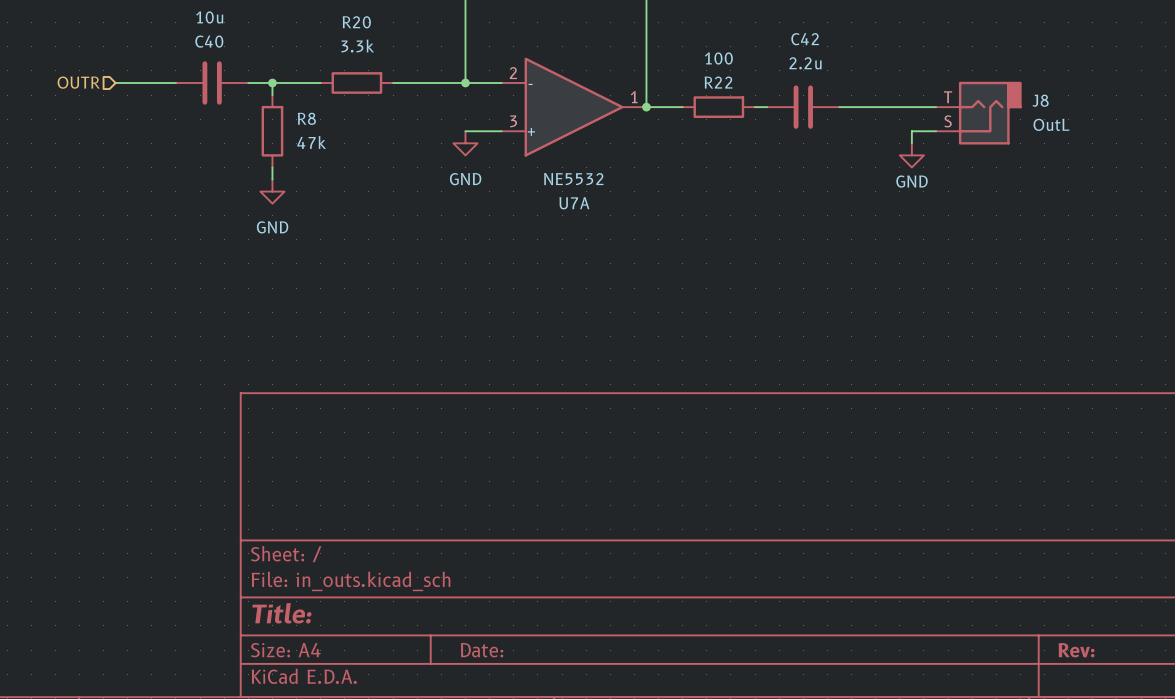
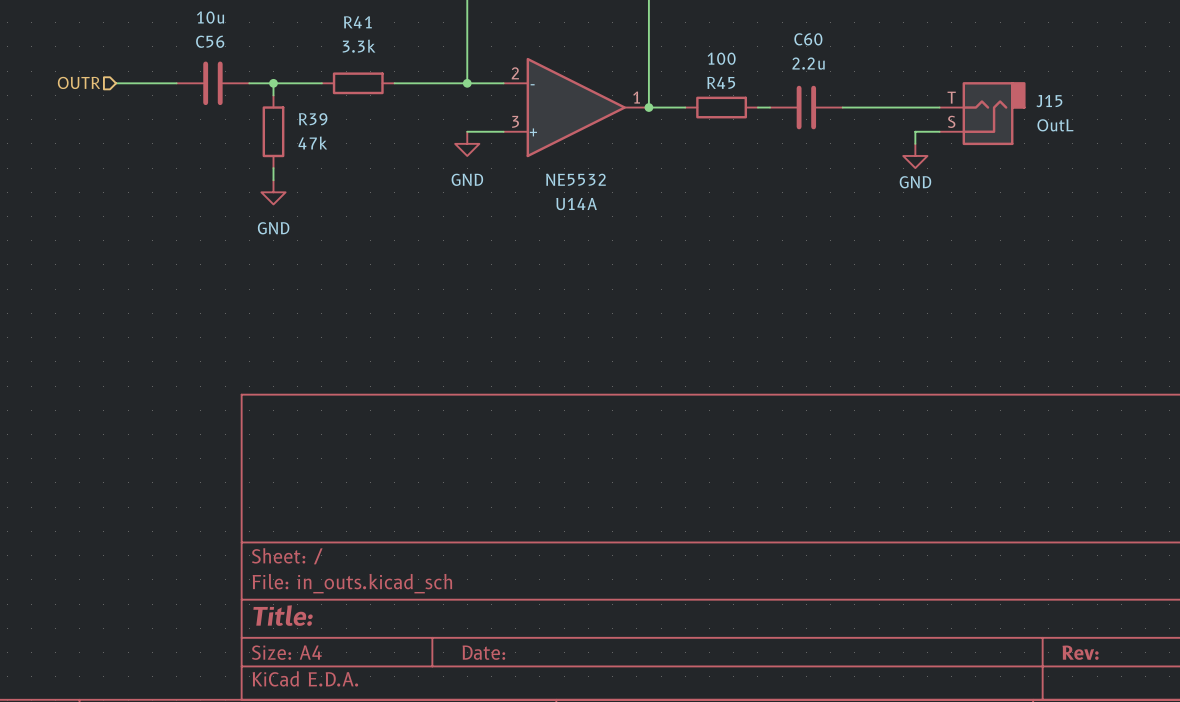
R20 name: R20 (356, 22) -> R41 (357, 22)
C42 name: C42 (805, 39) -> C60 (808, 39)
C40 name: C40 (209, 41) -> C56 (210, 41)
R22 name: R22 (718, 82) -> R45 (721, 82)
J8 name: J8 (1040, 100) -> J15 (1049, 101)
R8 name: R8 (306, 118) -> R39 (313, 119)
U7A name: U7A (574, 203) -> U14A (576, 204)

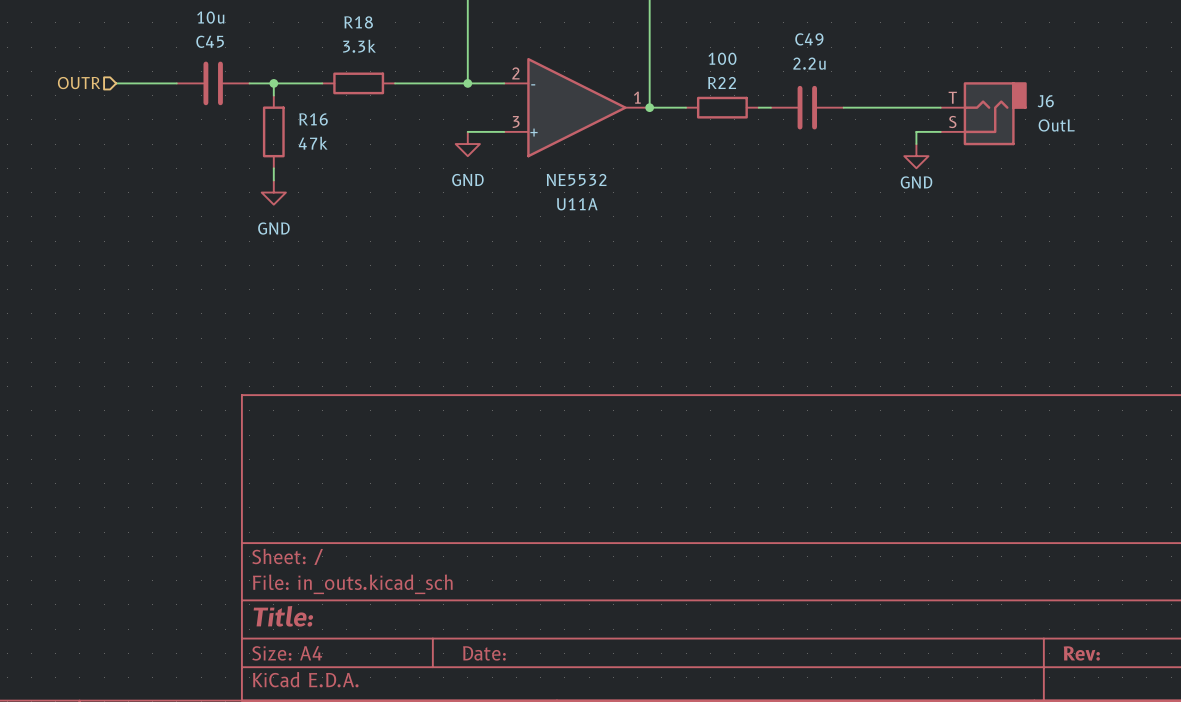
R41 name: R41 (357, 22) -> R18 (358, 22)
C60 name: C60 (808, 39) -> C49 (809, 39)
C56 name: C56 (210, 41) -> C45 (210, 41)
R45 name: R45 (721, 82) -> R22 (722, 82)
J15 name: J15 (1049, 101) -> J6 (1045, 101)
R39 name: R39 (313, 119) -> R16 (313, 119)
U14A name: U14A (576, 204) -> U11A (577, 204)

